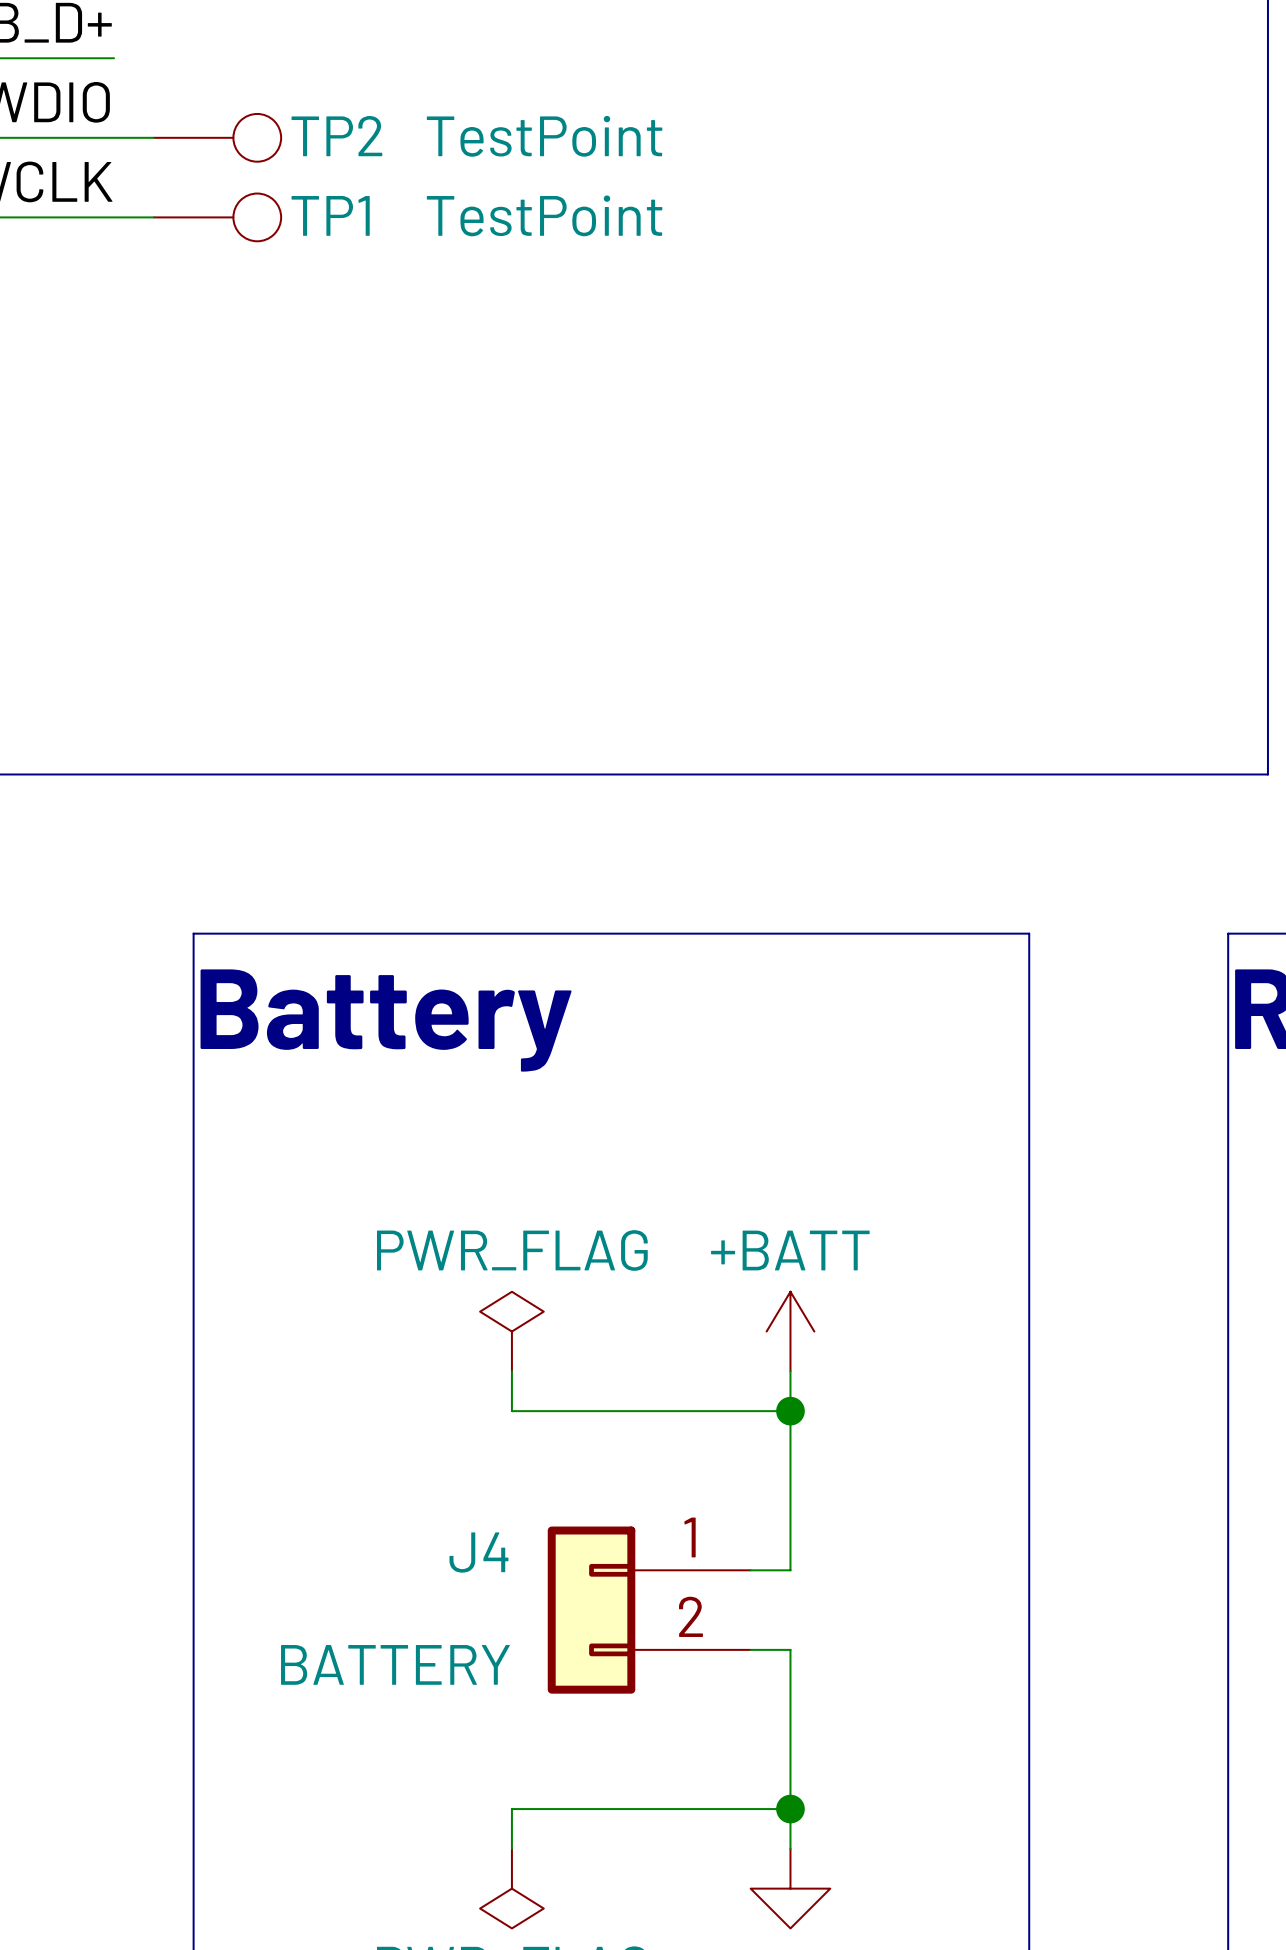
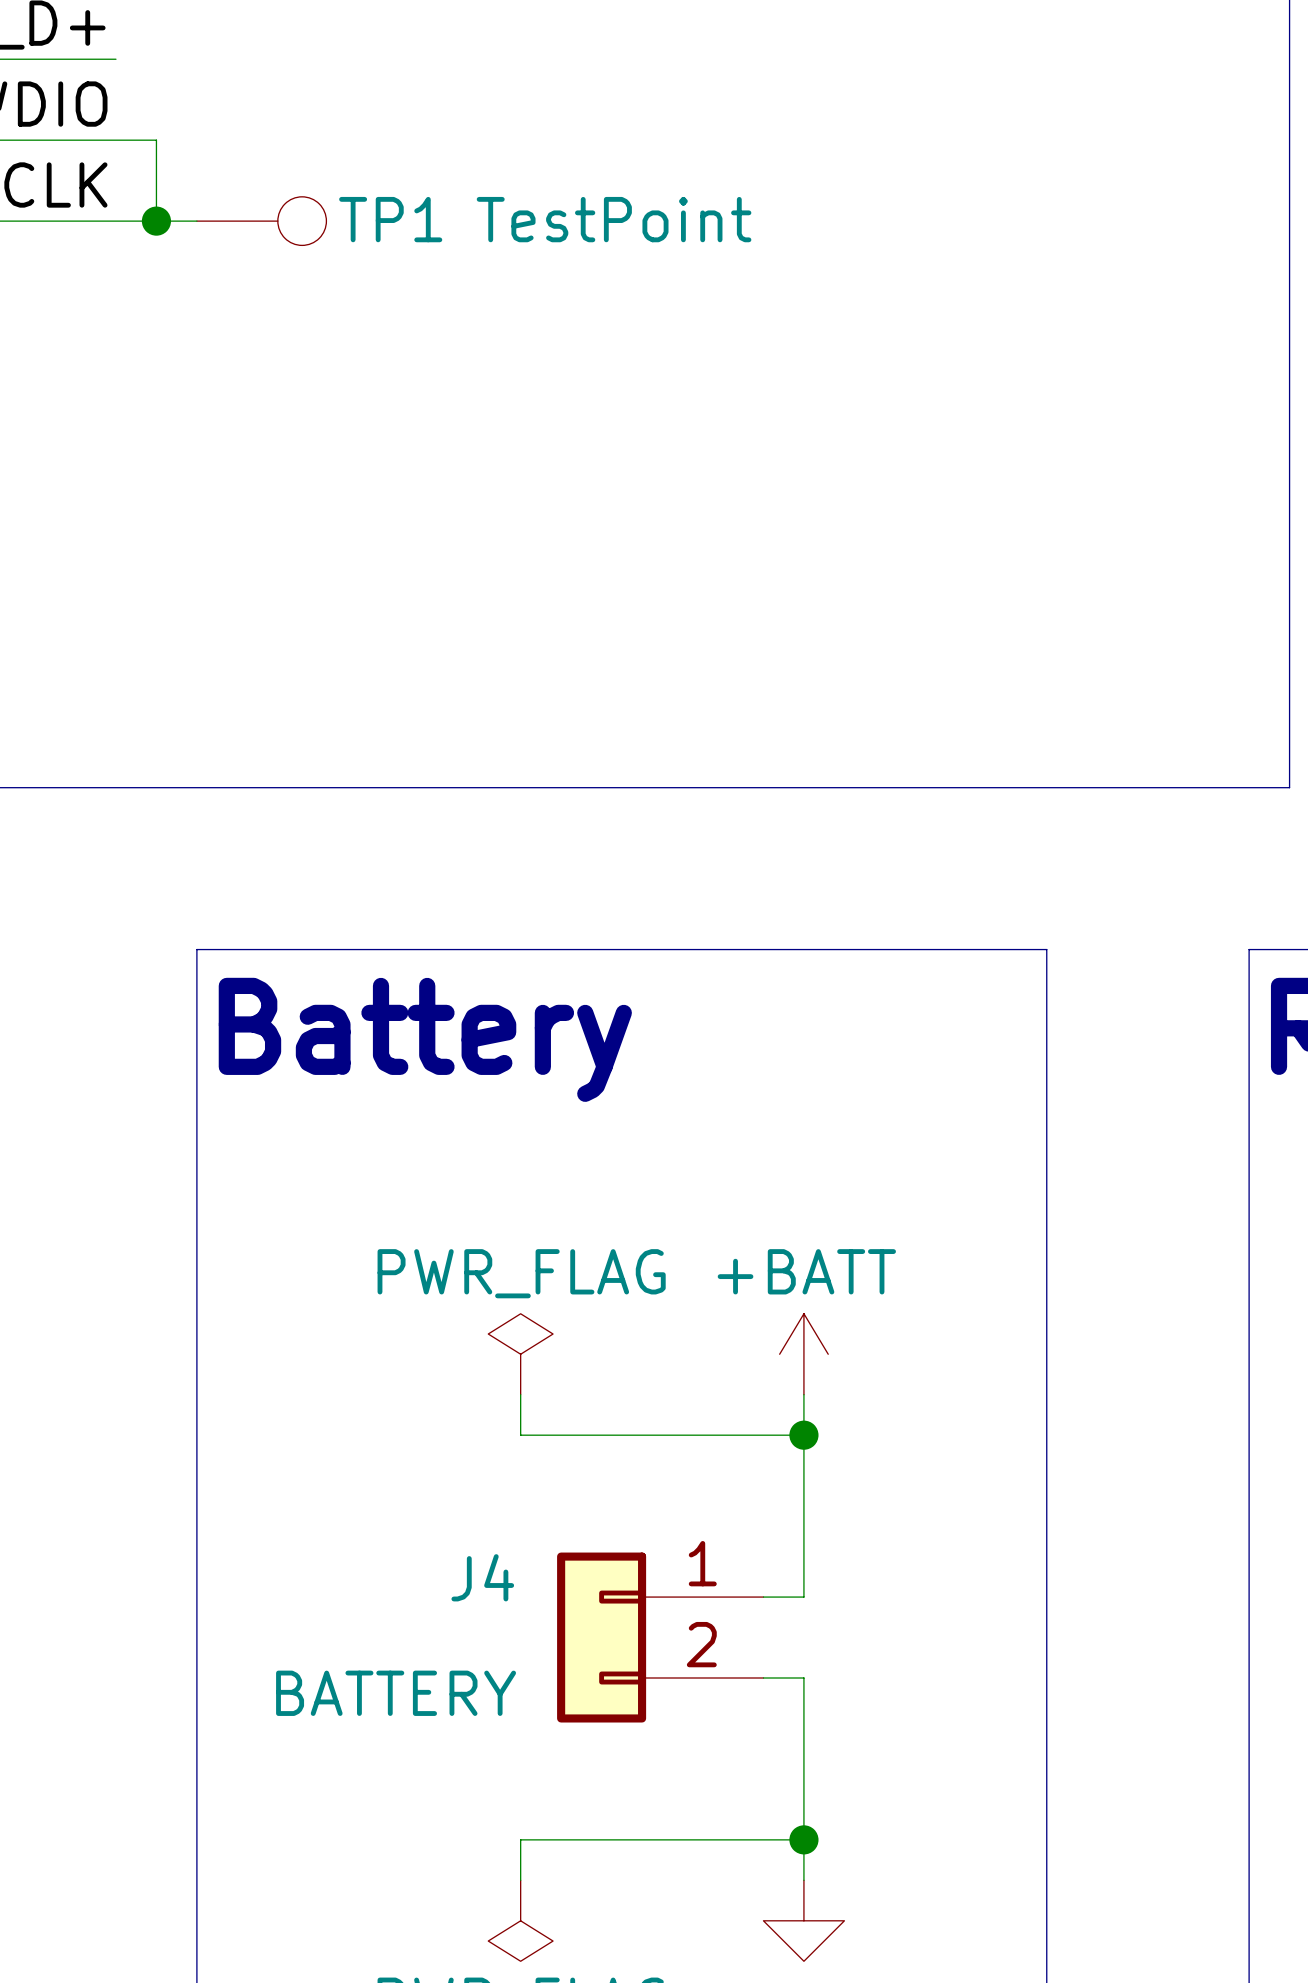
wire: none -> (156, 140) (156, 221) (196, 221)
TP2: TestPoint (217, 137) -> none
junction: none -> (156, 221)
TP1 position: (217, 217) -> (261, 221)

